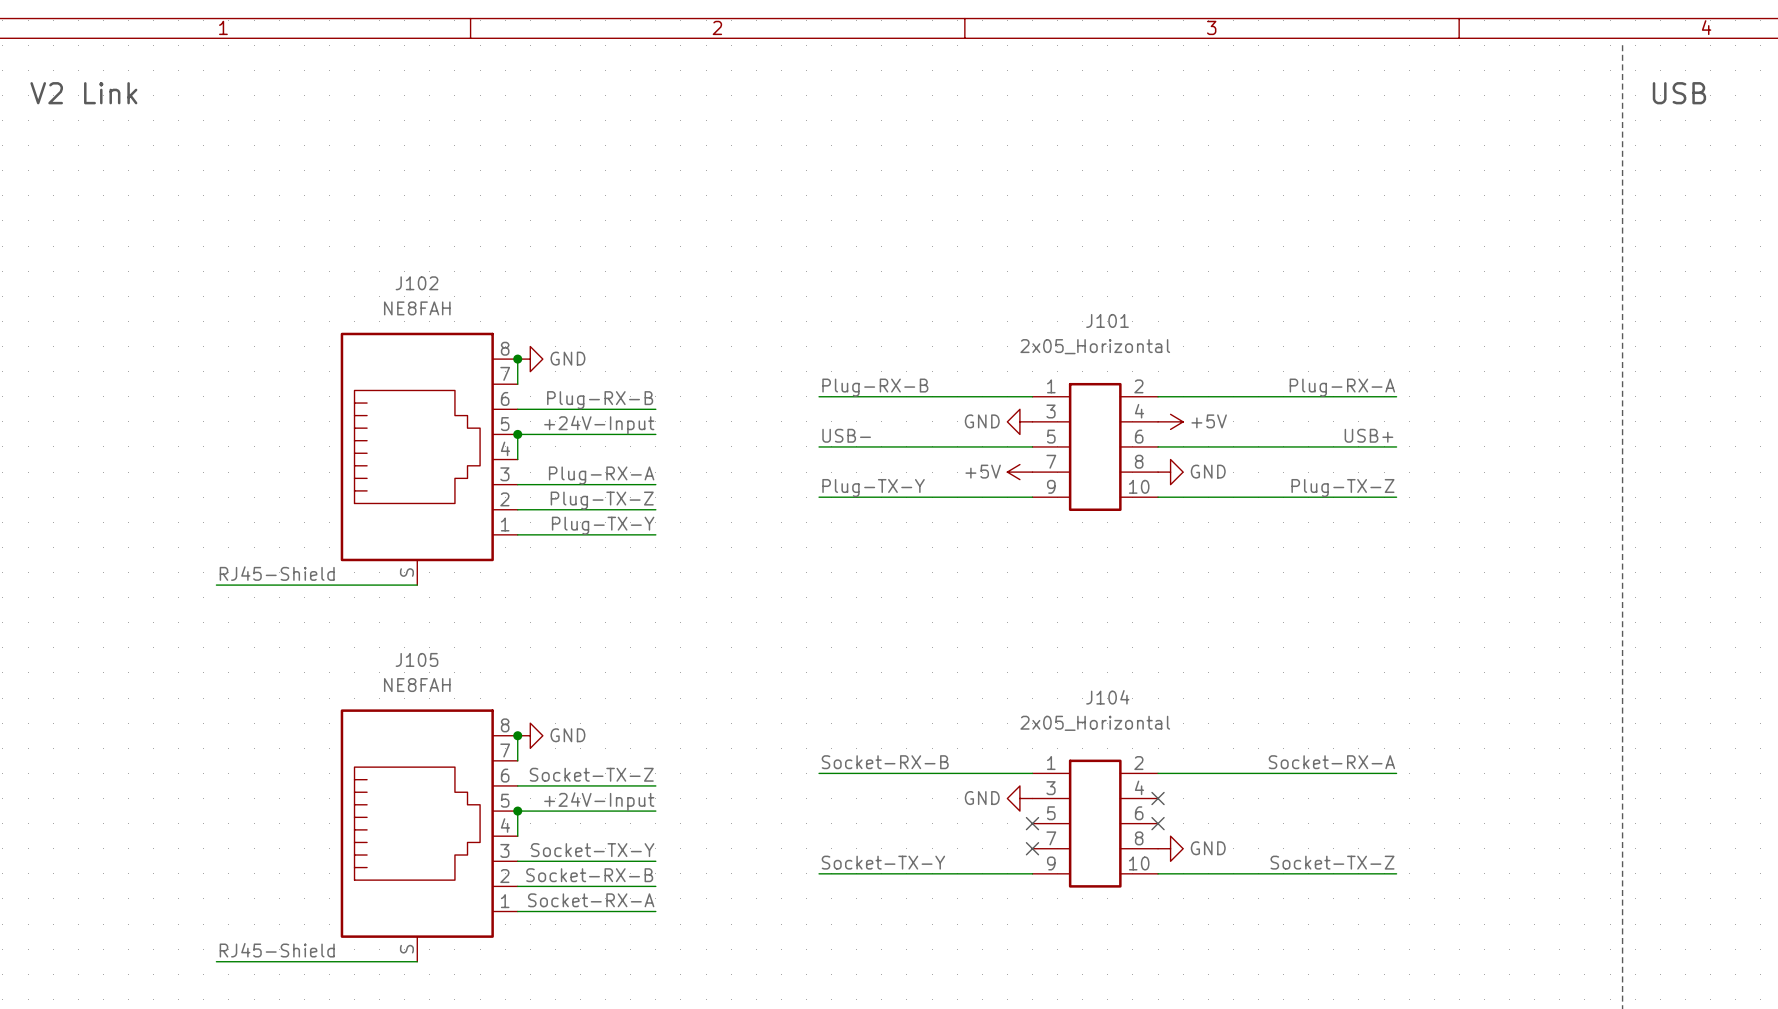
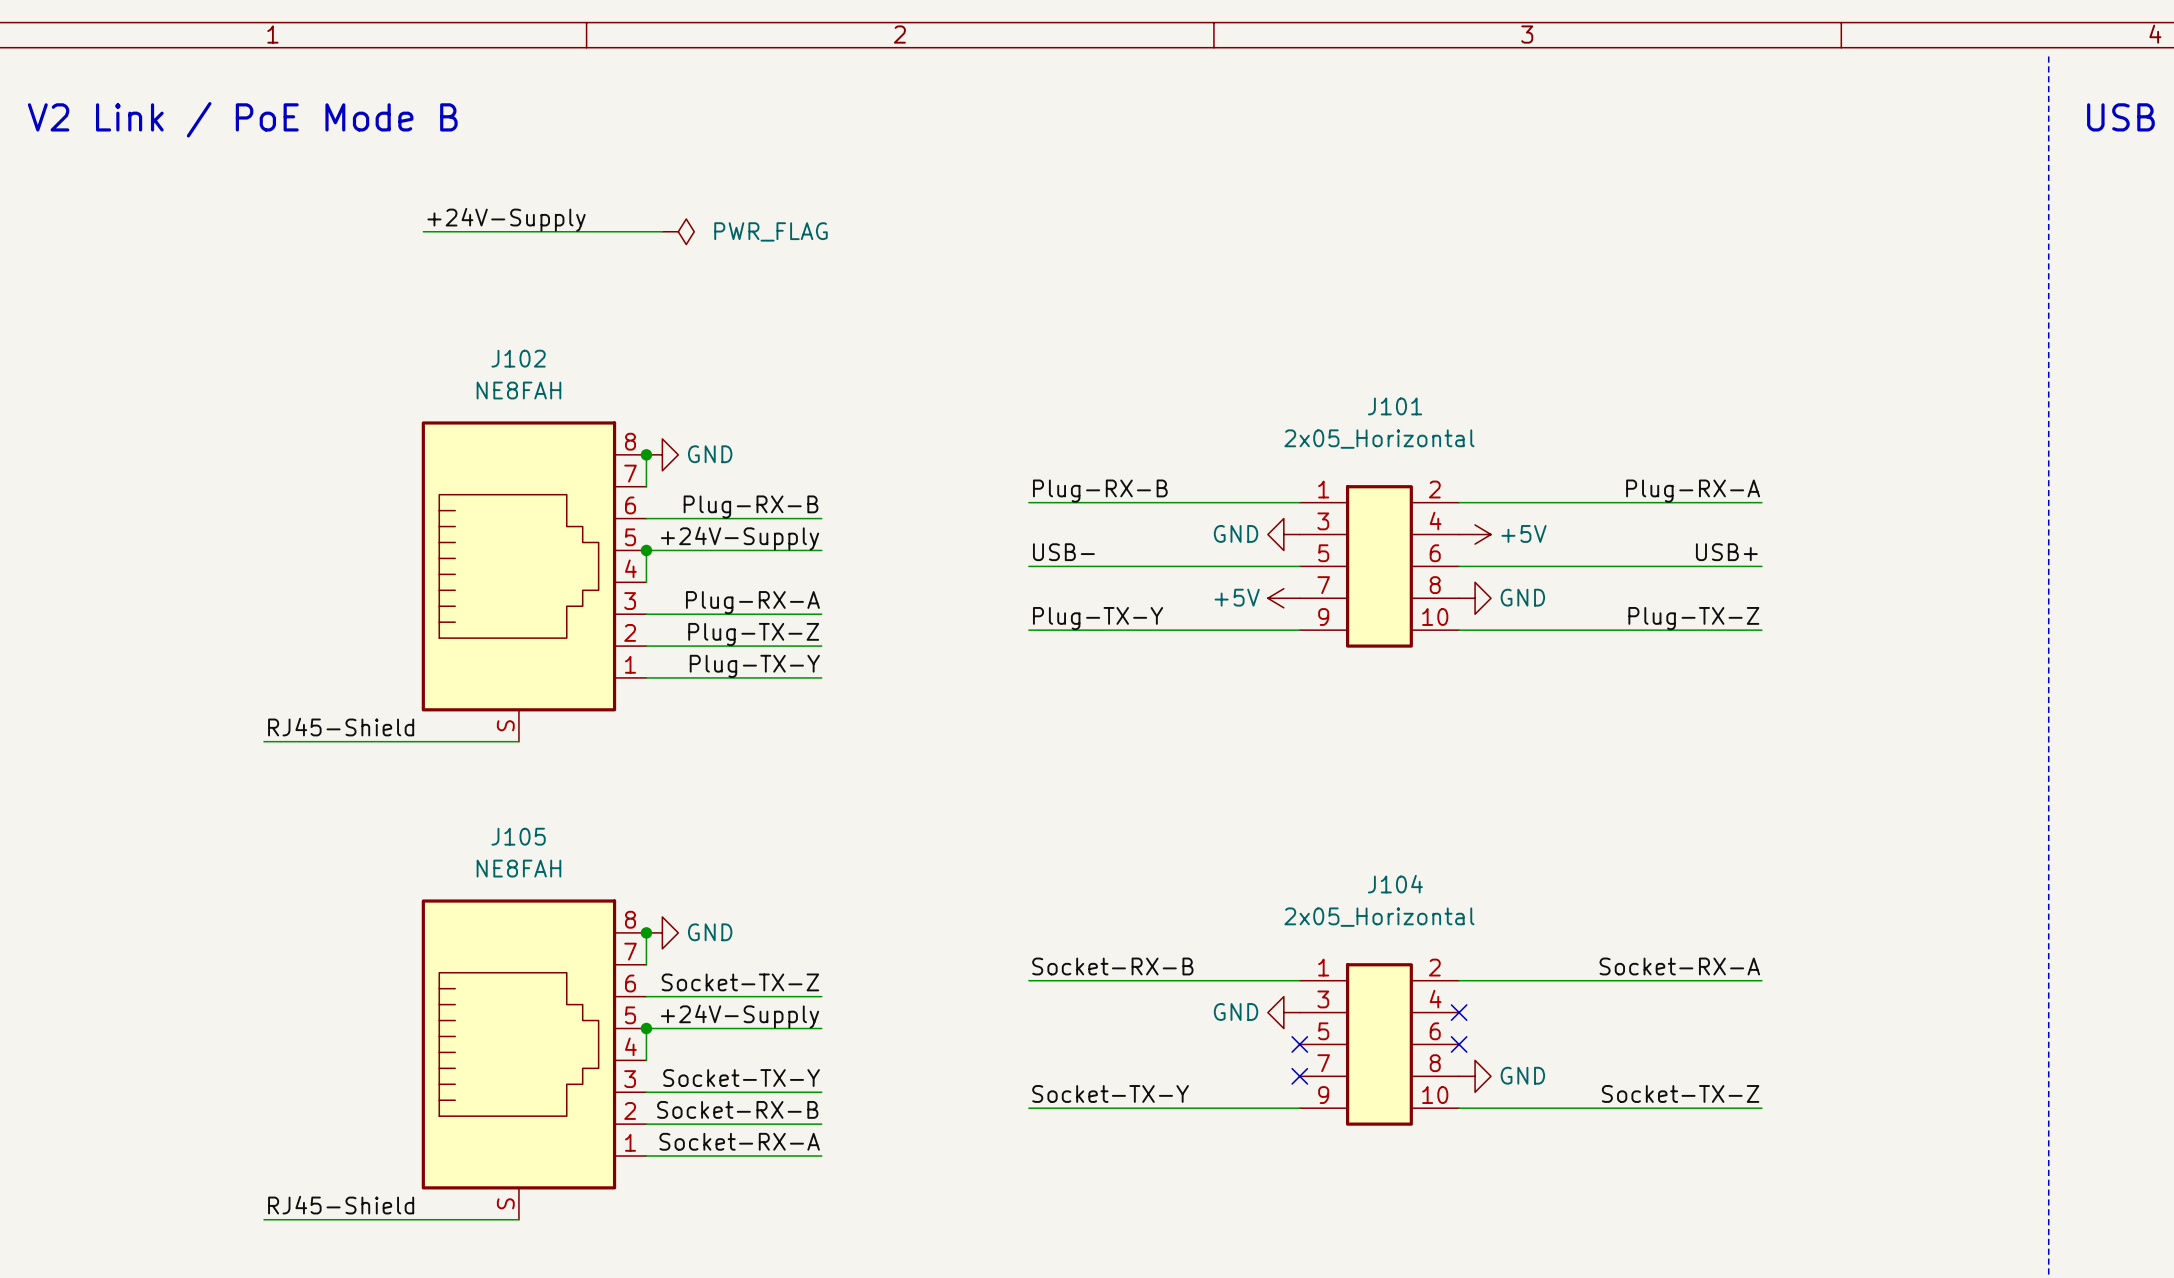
text: V2 Link (83, 93) -> V2 Link / PoE Mode B (242, 119)
label: none -> +24V-Supply (506, 219)
wire: none -> (423, 231) (662, 231)
power symbol: none -> PWR_FLAG (678, 231)
label: +24V-Input (599, 425) -> +24V-Supply (740, 538)
label: +24V-Input (599, 801) -> +24V-Supply (740, 1016)

